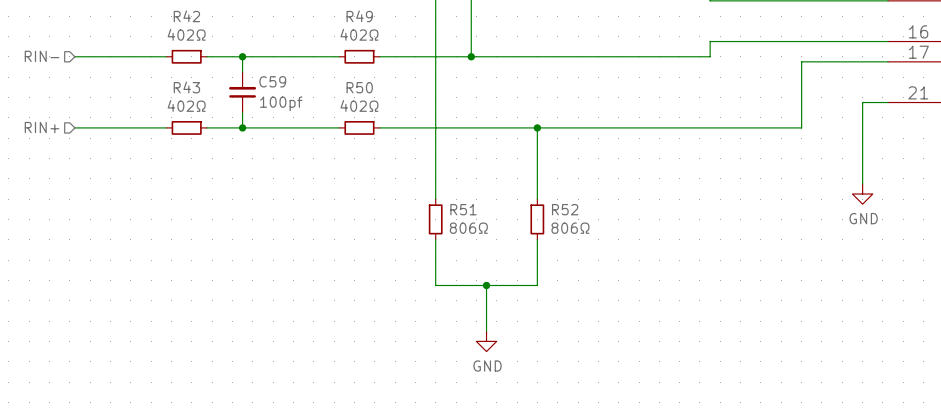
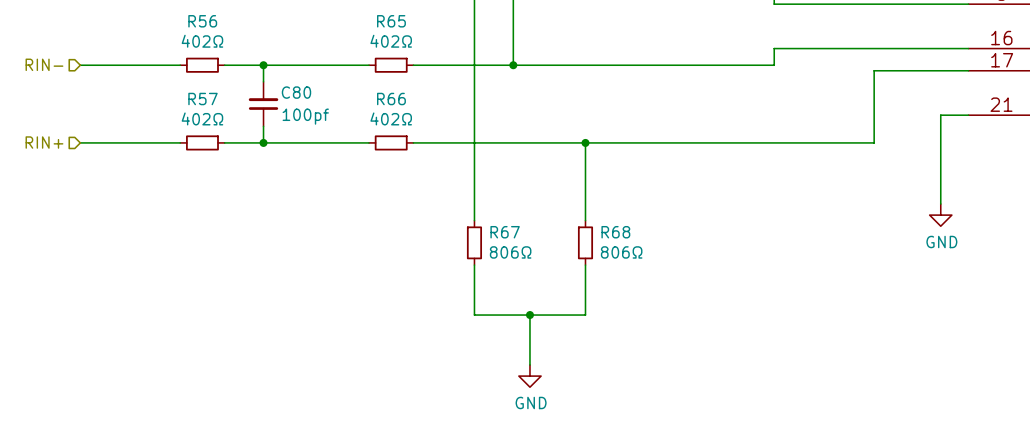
R42 name: R42 (186, 16) -> R56 (202, 21)
R49 name: R49 (359, 16) -> R65 (391, 21)
C59 name: C59 (272, 81) -> C80 (296, 92)
R43 name: R43 (186, 87) -> R57 (202, 99)
R50 name: R50 (359, 87) -> R66 (391, 99)
R51 name: R51 (463, 209) -> R67 (505, 232)
R52 name: R52 (565, 209) -> R68 (615, 232)

